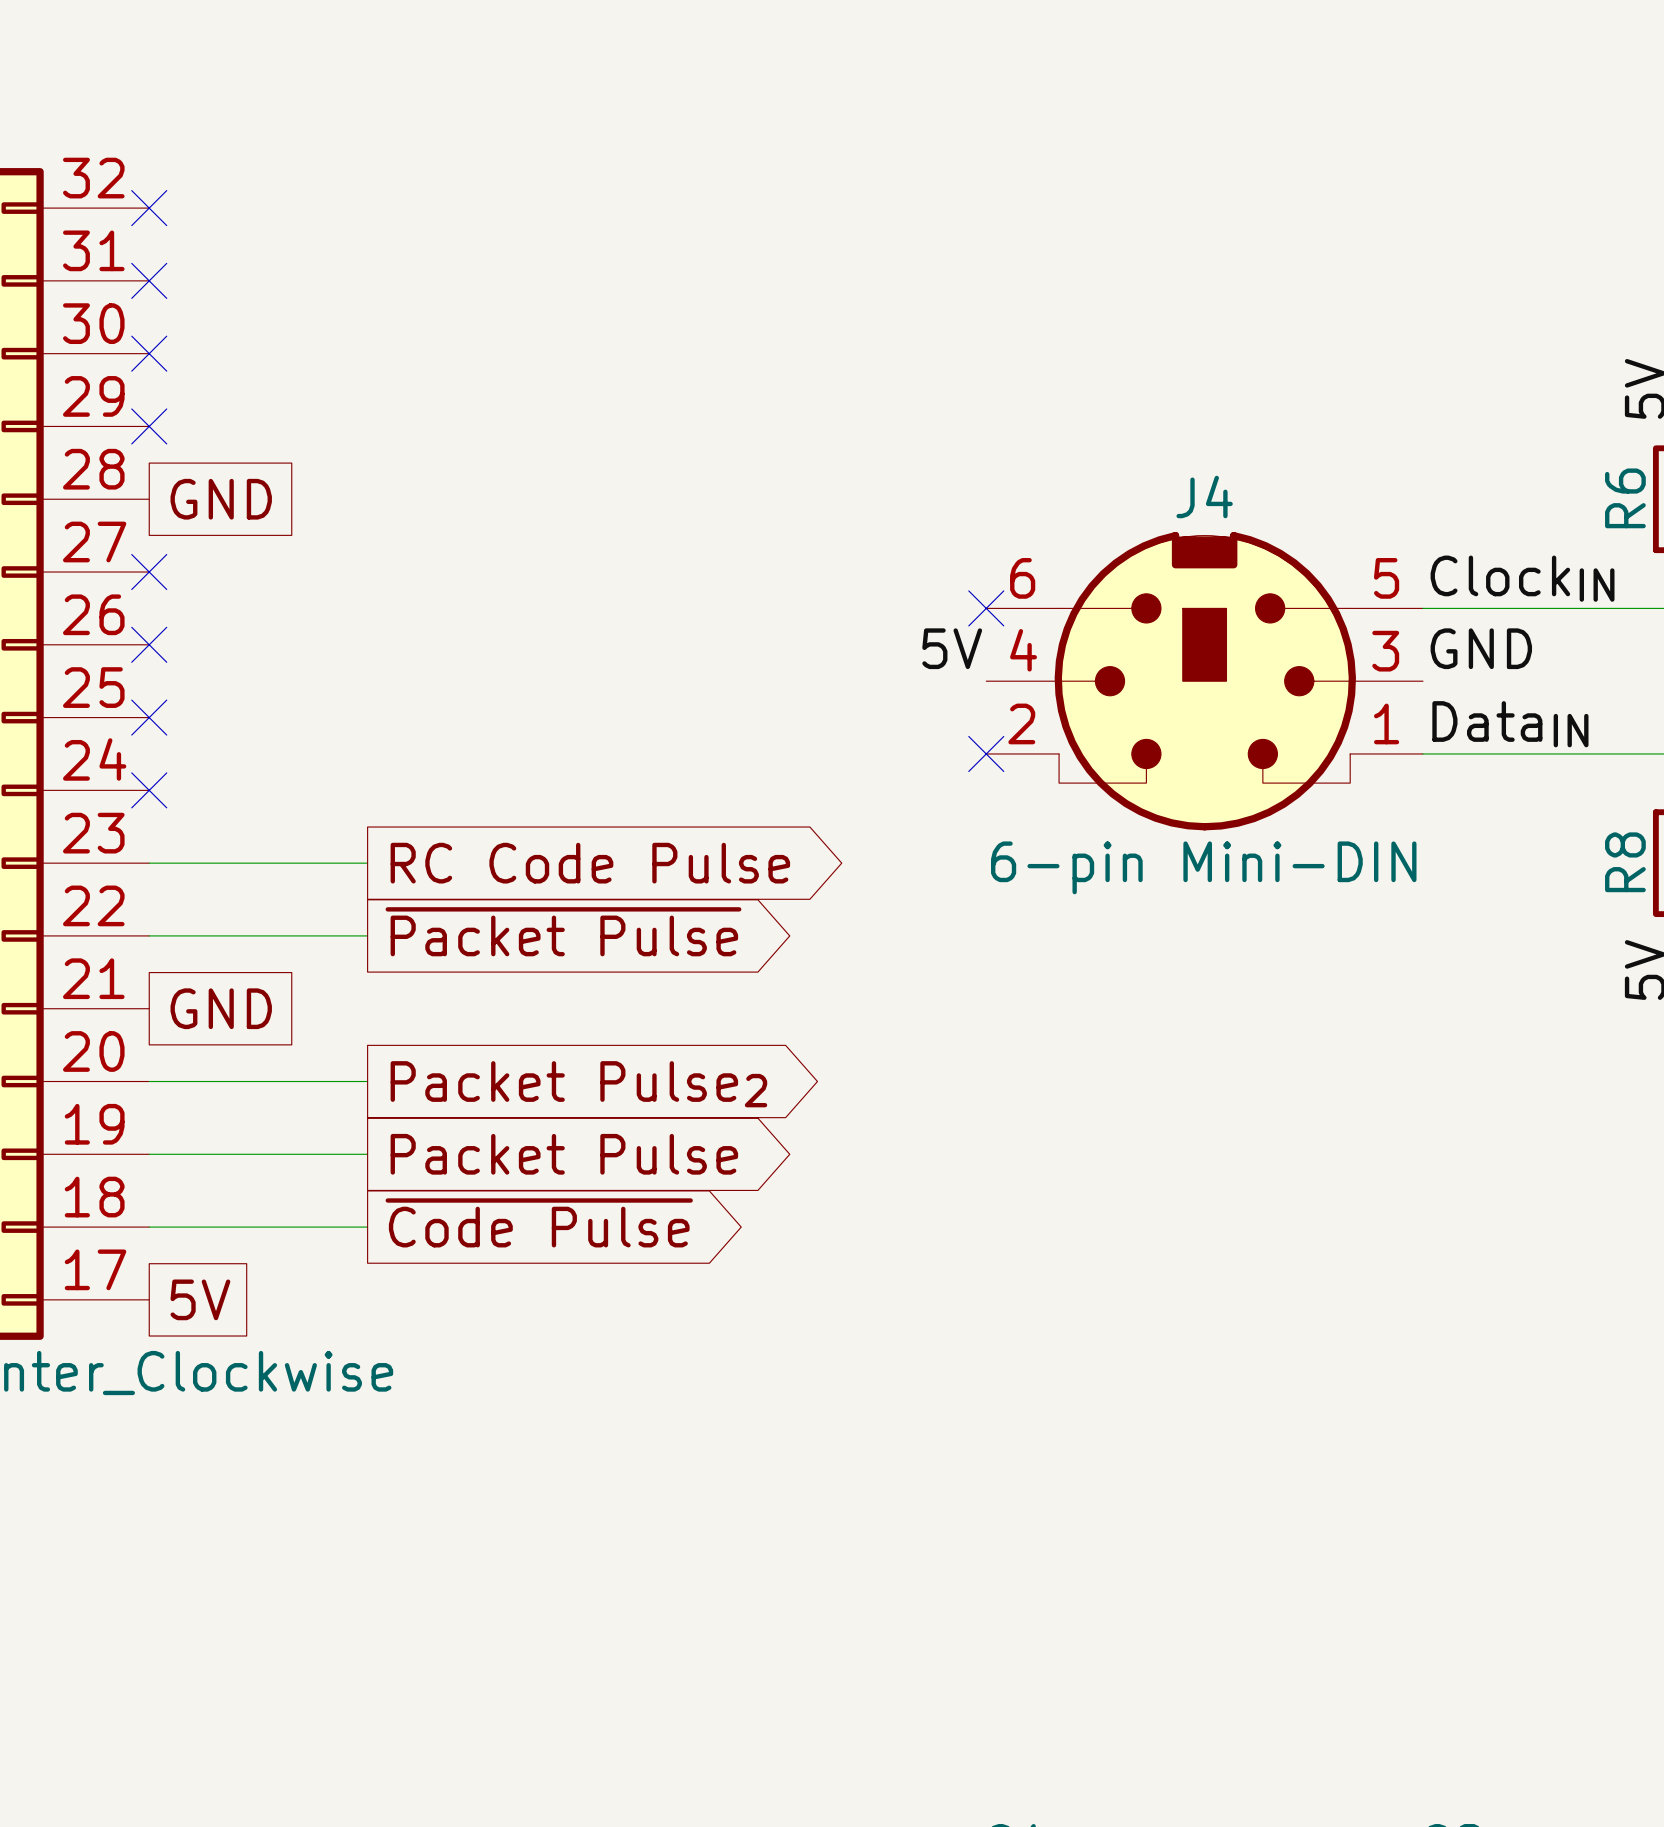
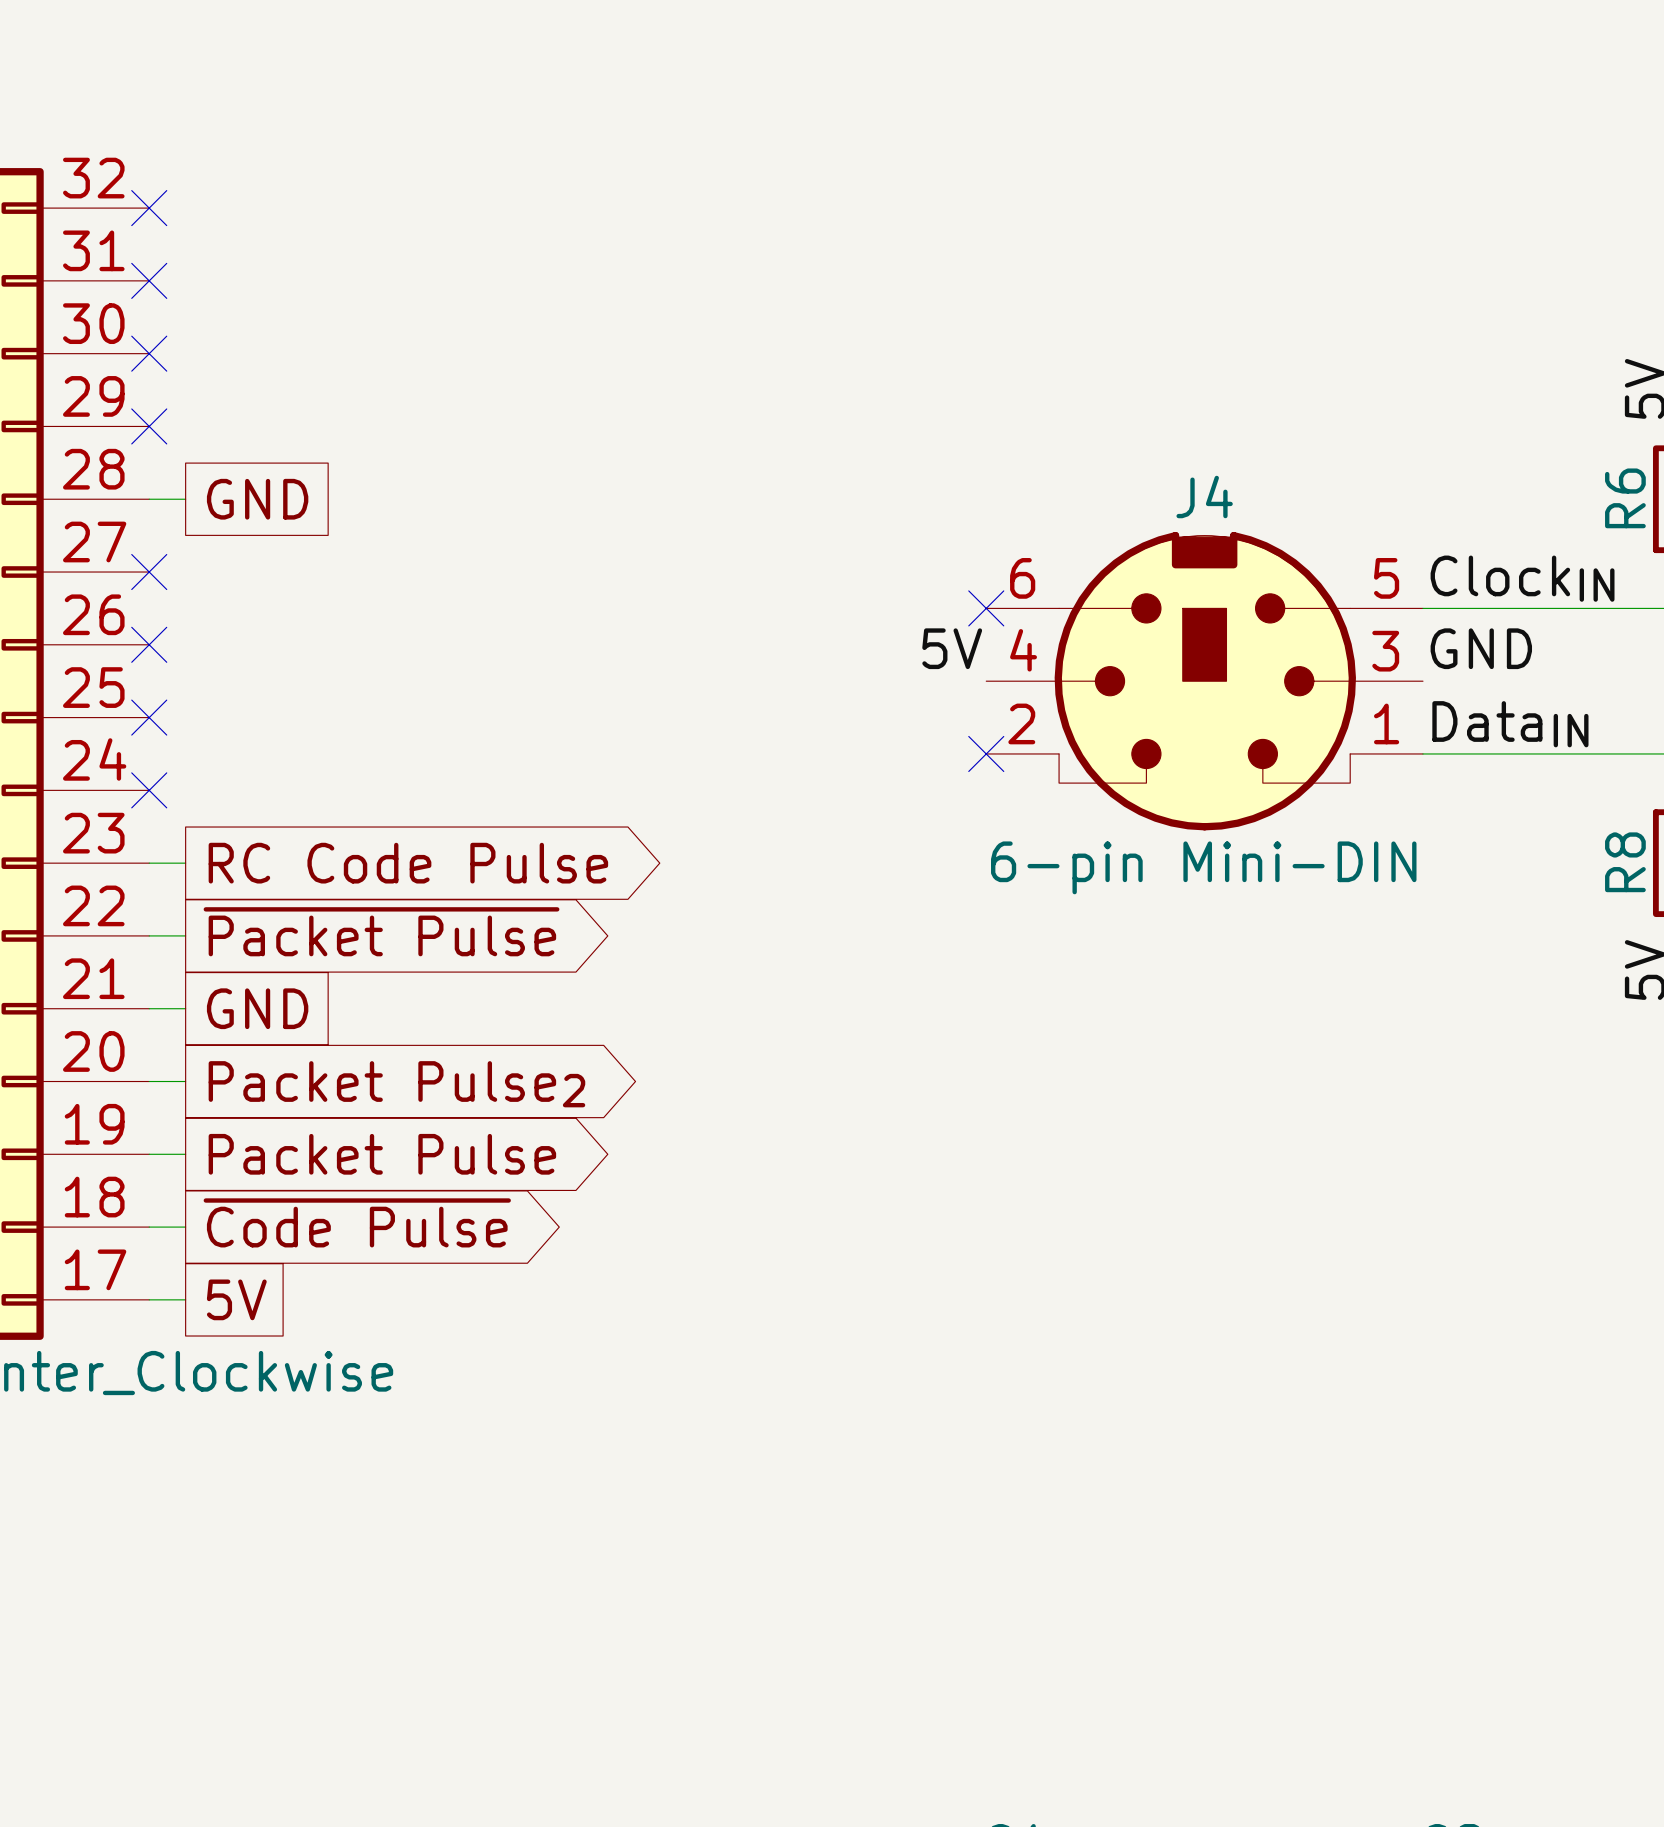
wire: none -> (149, 499) (185, 499)
global label position: GND (221, 499) -> GND (257, 499)
wire: (185, 863) (367, 863) -> none
global label position: RC Code Pulse (590, 863) -> RC Code Pulse (408, 863)
global label position: ~{Packet Pulse} (563, 931) -> ~{Packet Pulse} (381, 931)
wire: (185, 935) (367, 935) -> none
wire: none -> (149, 1008) (185, 1008)
global label position: GND (221, 1008) -> GND (257, 1008)
wire: (185, 1081) (367, 1081) -> none
global label position: Packet Pulse2 (578, 1084) -> Packet Pulse2 (396, 1084)
wire: (185, 1154) (367, 1154) -> none
global label position: Packet Pulse (564, 1154) -> Packet Pulse (382, 1154)
global label position: ~{Code Pulse} (539, 1222) -> ~{Code Pulse} (357, 1222)
wire: (185, 1227) (367, 1227) -> none
wire: none -> (149, 1299) (185, 1299)
global label position: 5V (200, 1299) -> 5V (236, 1299)

